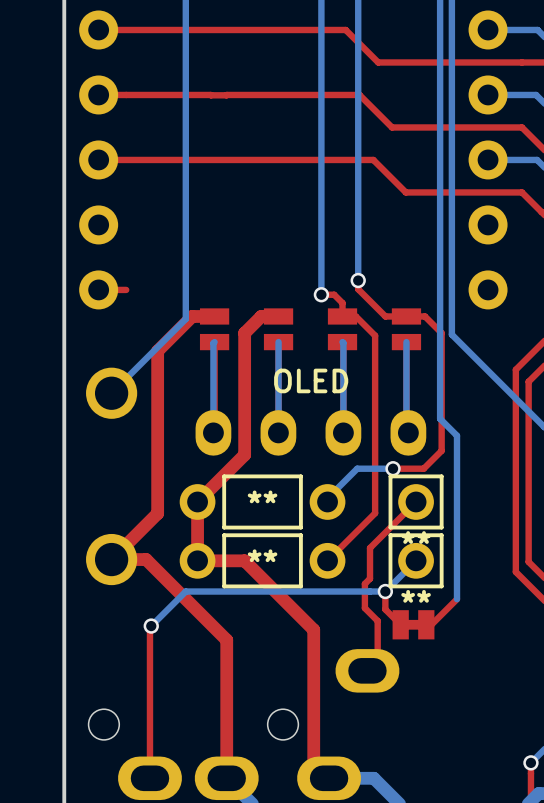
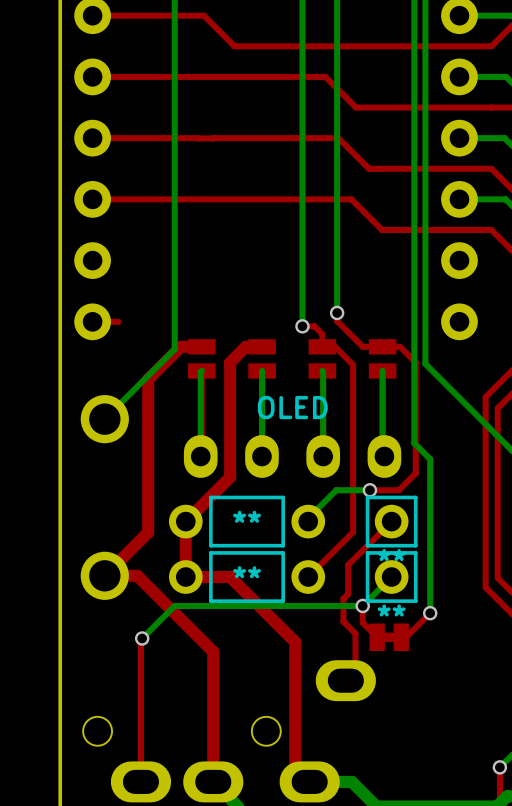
via: none -> (430, 613)

